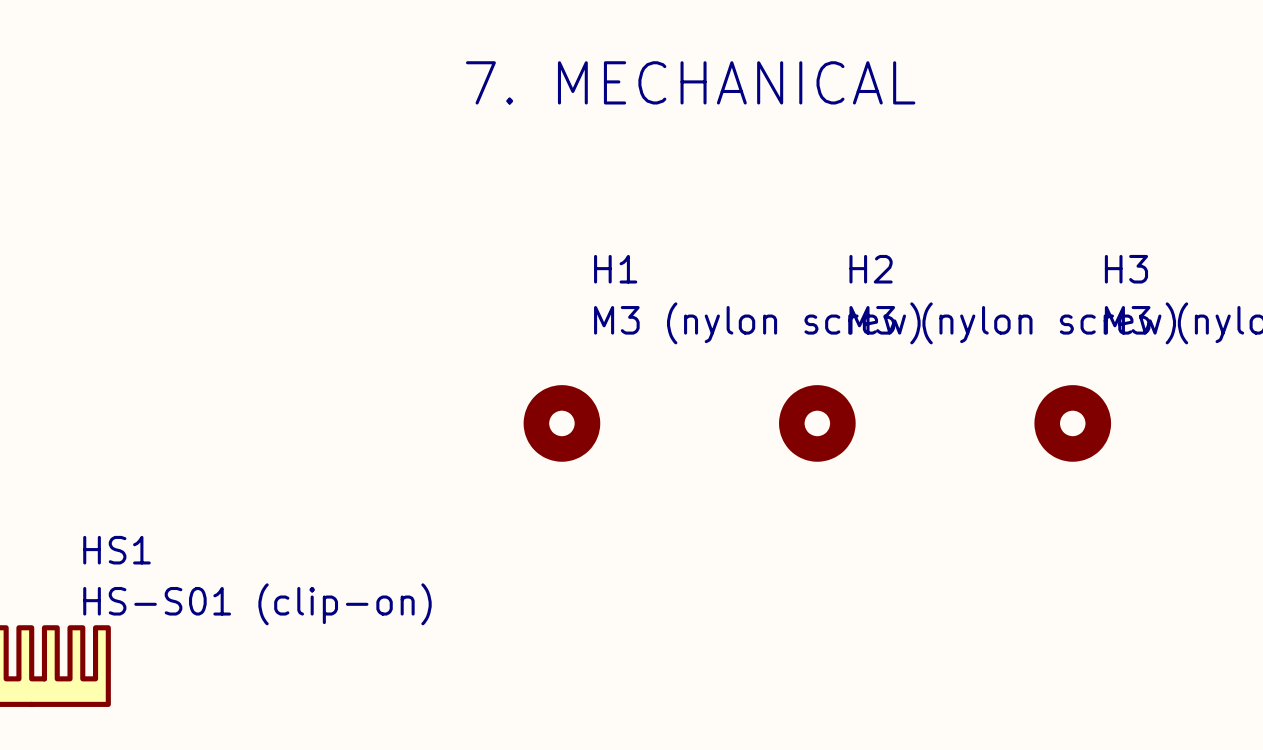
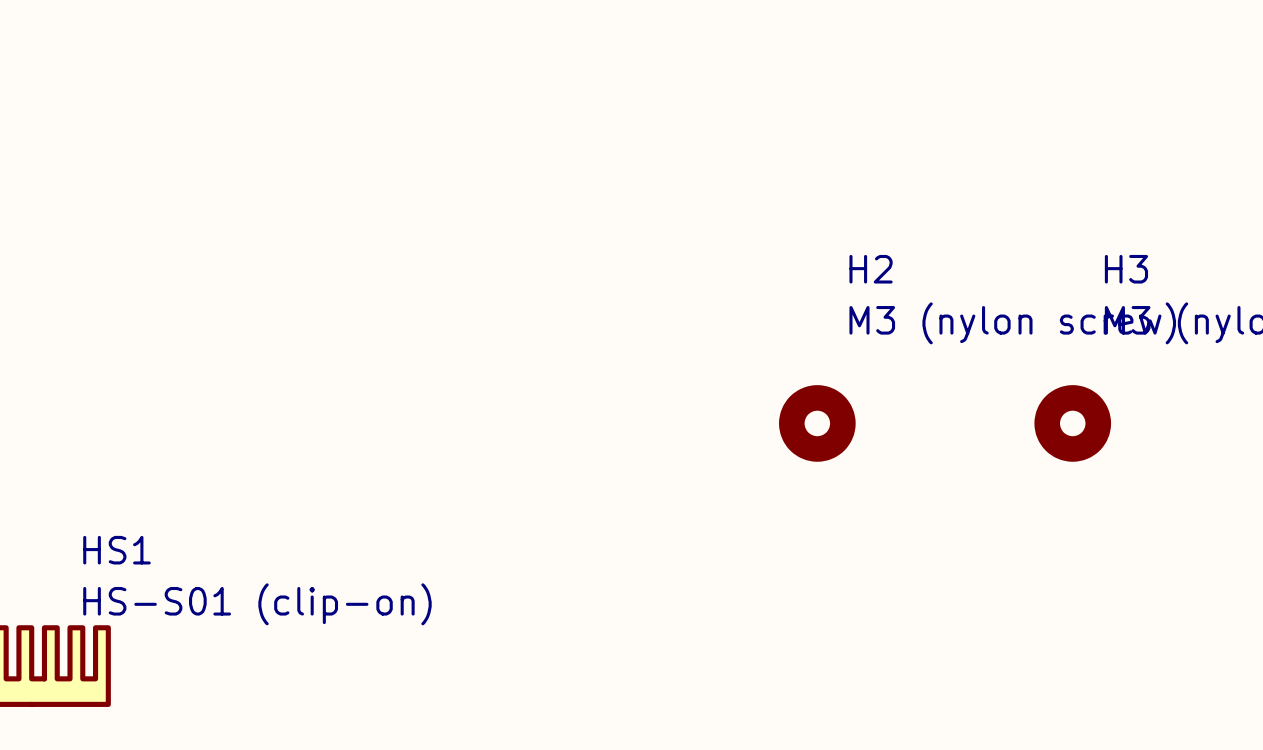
text: 7. MECHANICAL (690, 82) -> none
H1: M3 (nylon screw) (561, 423) -> none

